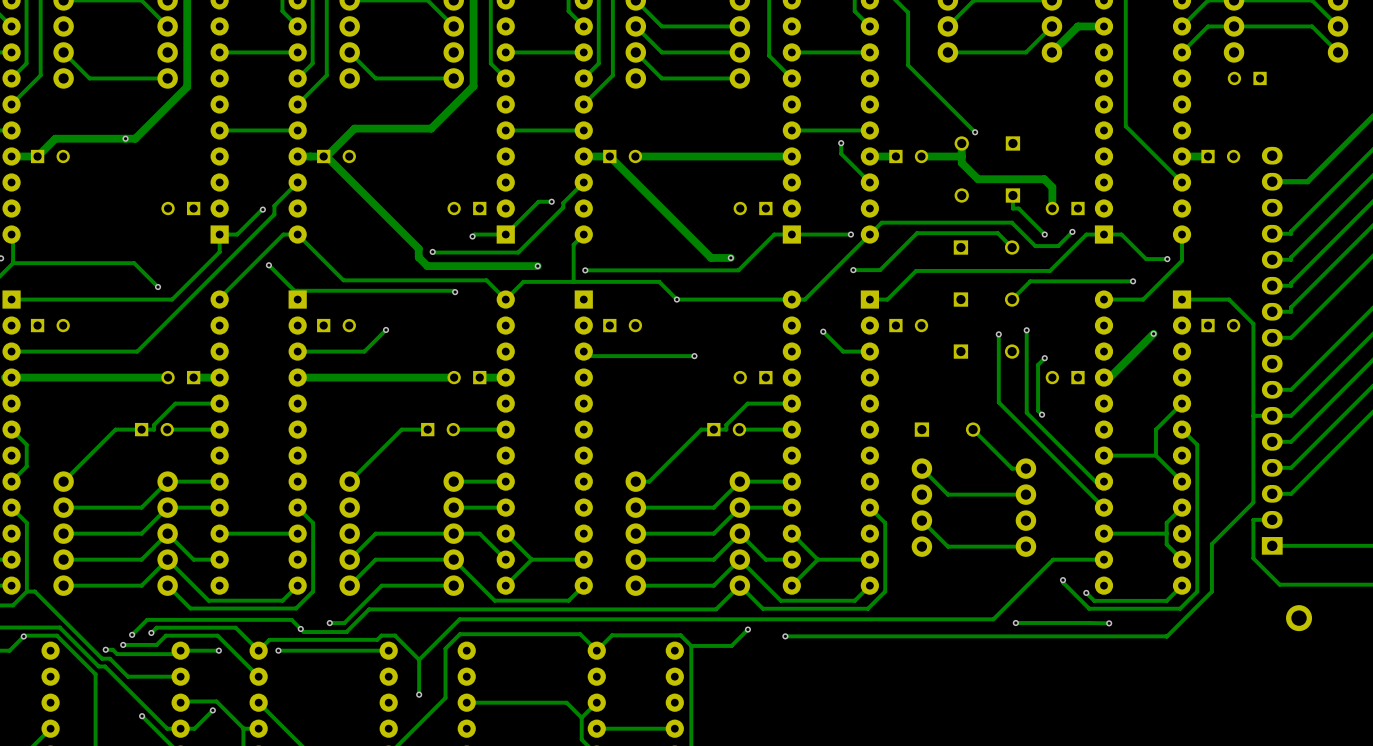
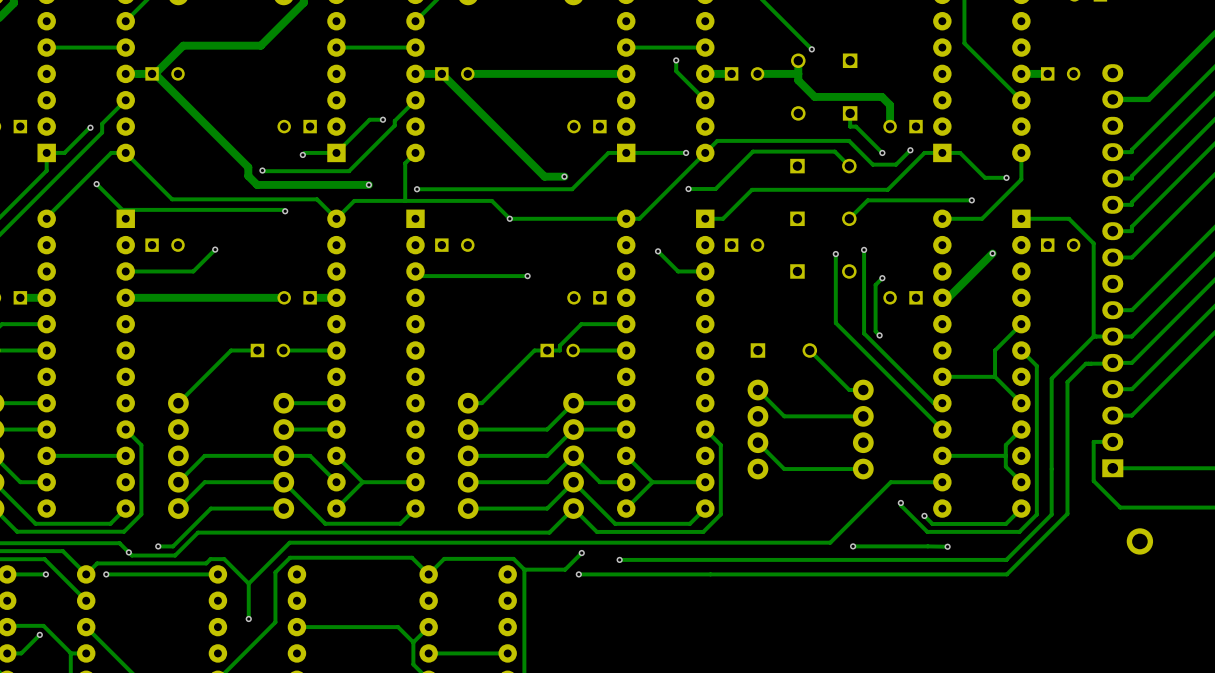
track: (1253, 415) (1253, 502) (1211, 544) -> (1093, 336) (1051, 378) (1051, 466)
track: none -> (1112, 362) (1085, 363) (1067, 382) (1067, 513) (1006, 574) (578, 574)
via: none -> (578, 574)

